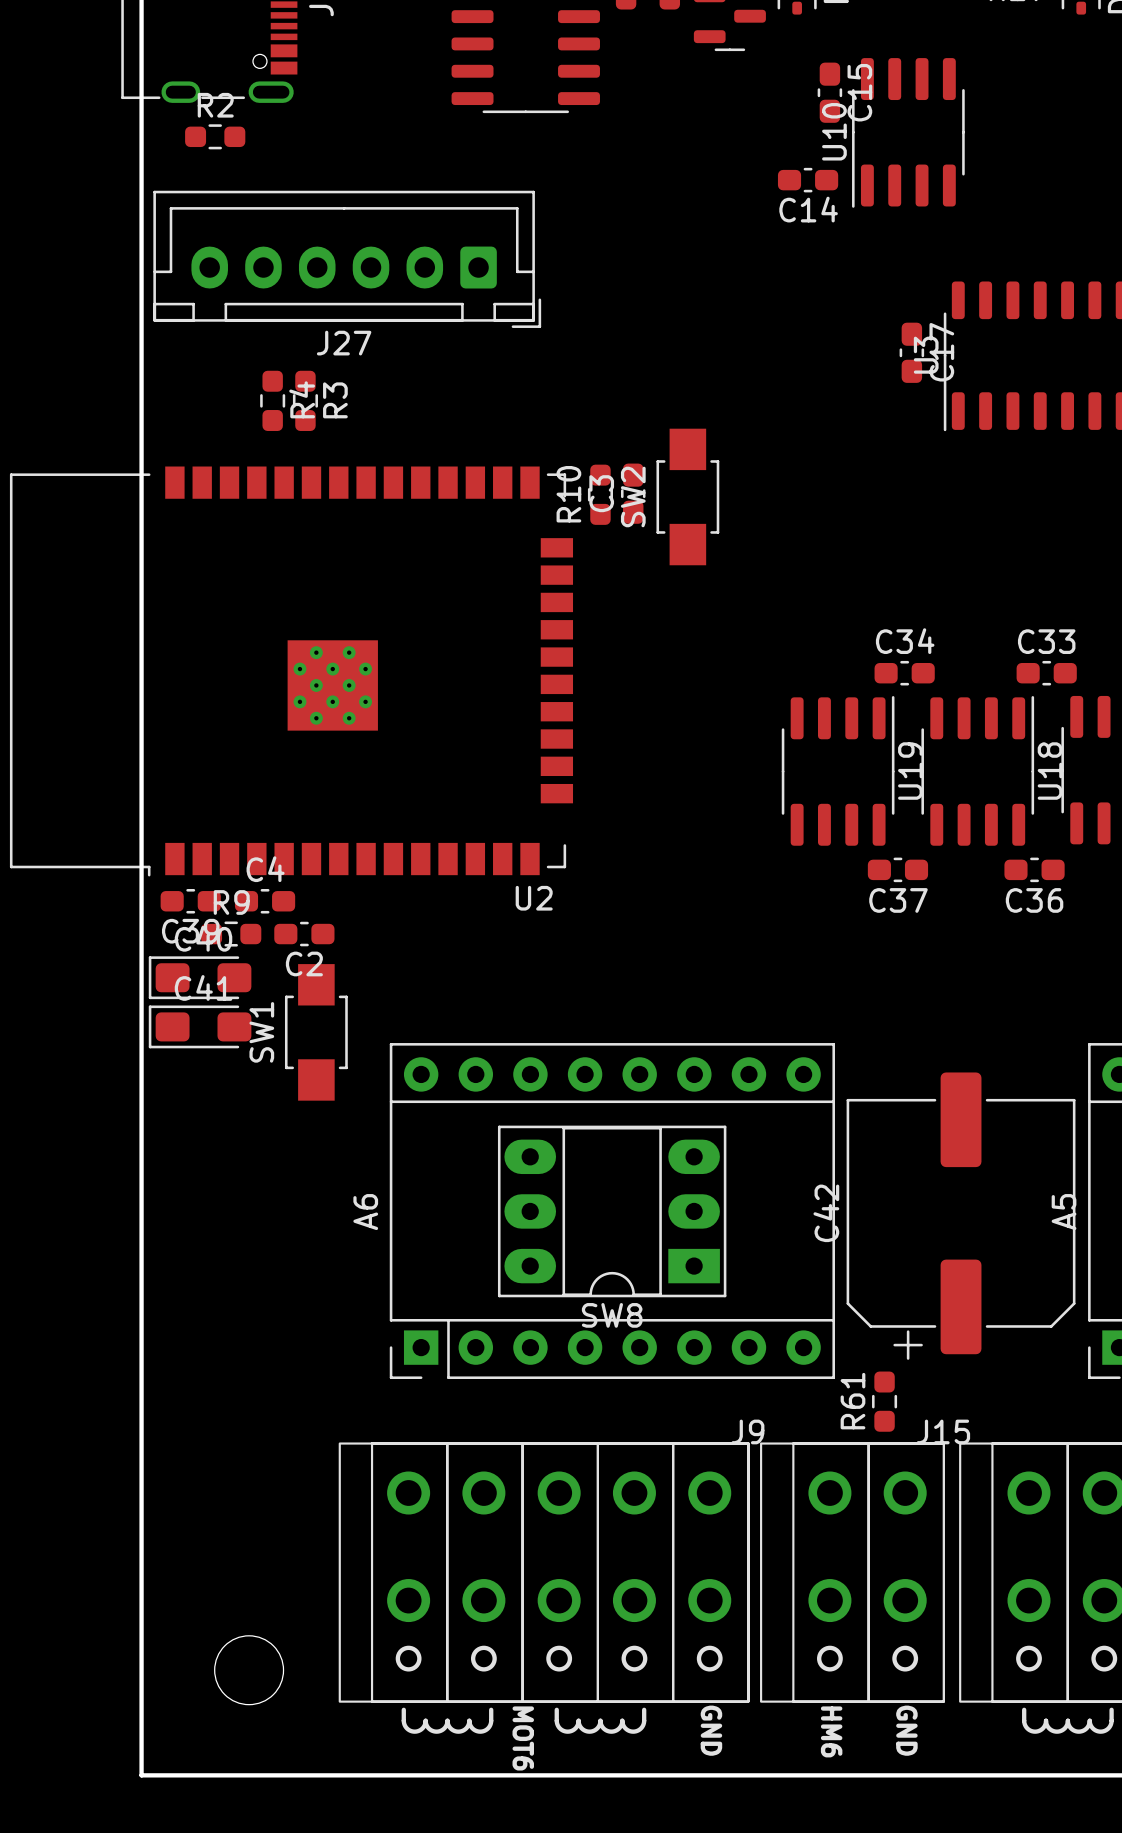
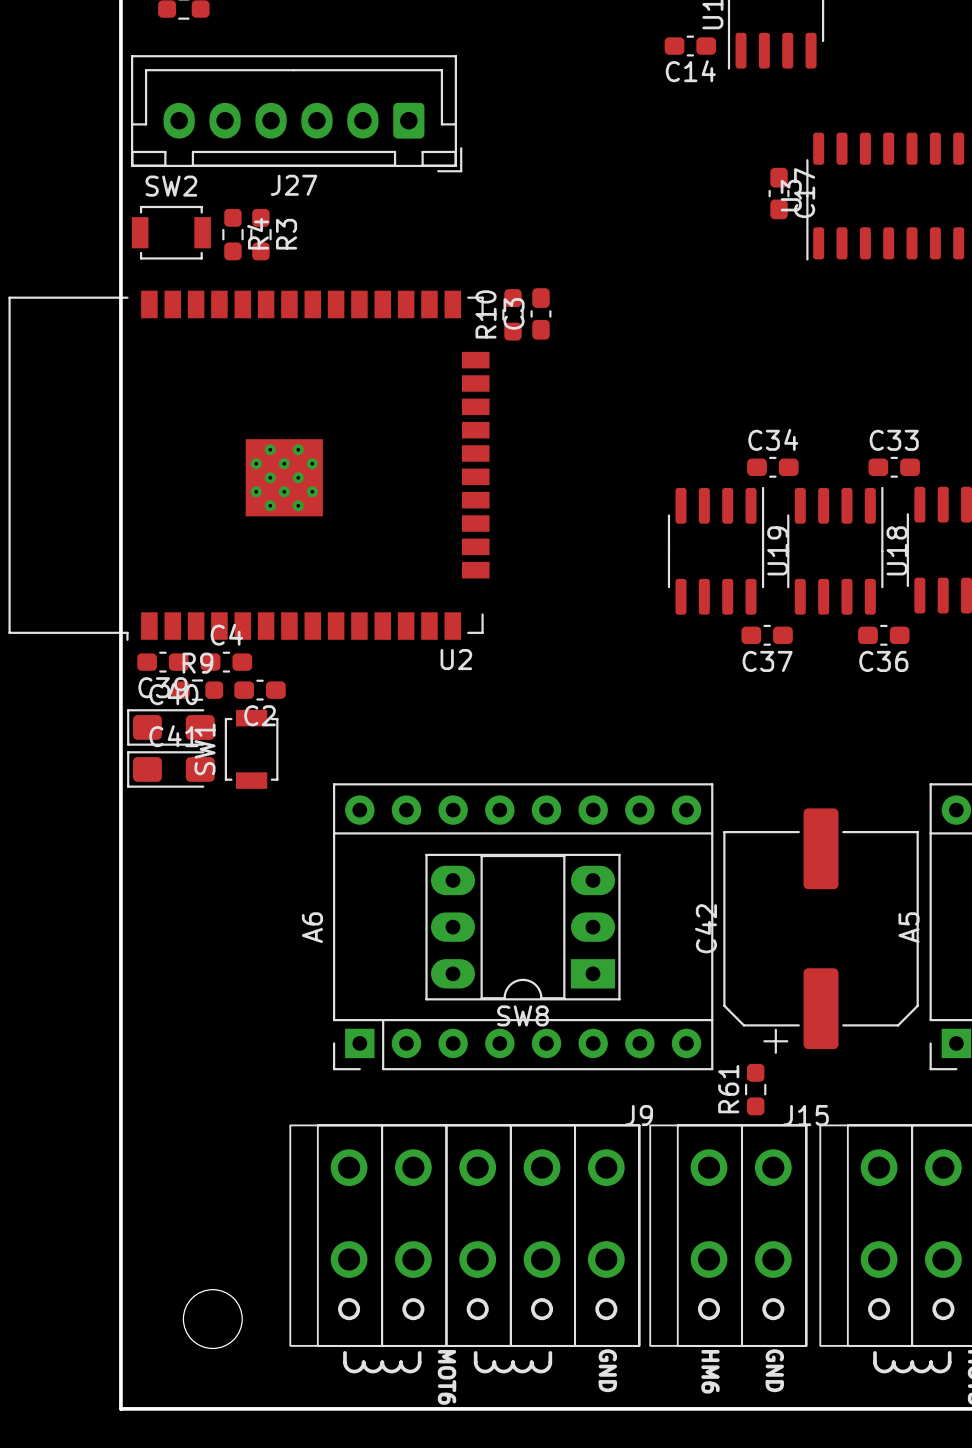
SW2 footprint: [656, 428, 720, 566] -> [131, 205, 211, 260]
SW2 name position: SW2 (633, 496) -> SW2 (171, 186)
SW1 footprint: [284, 964, 348, 1101] -> [224, 709, 279, 789]

